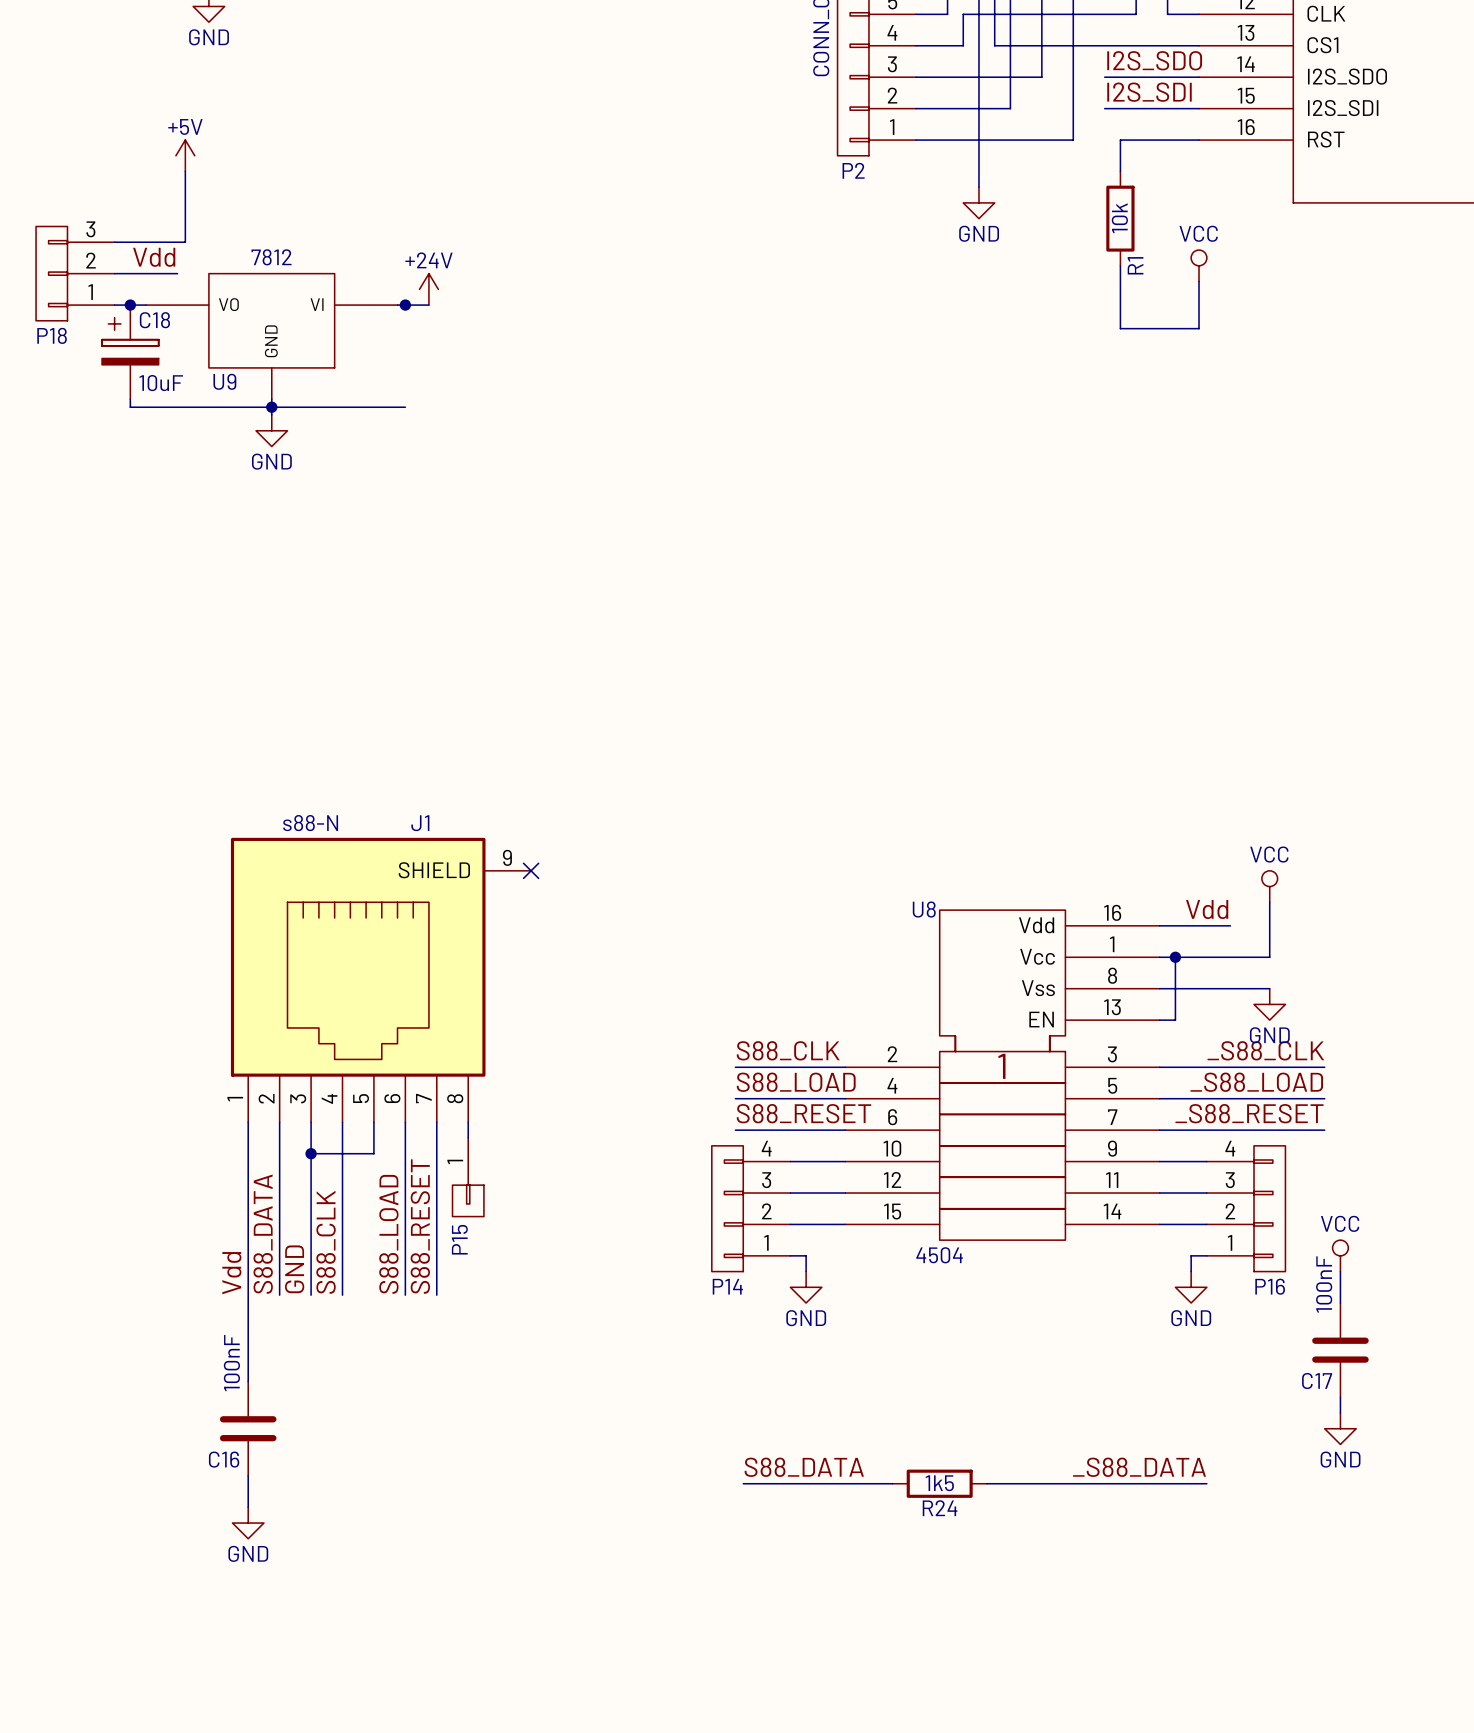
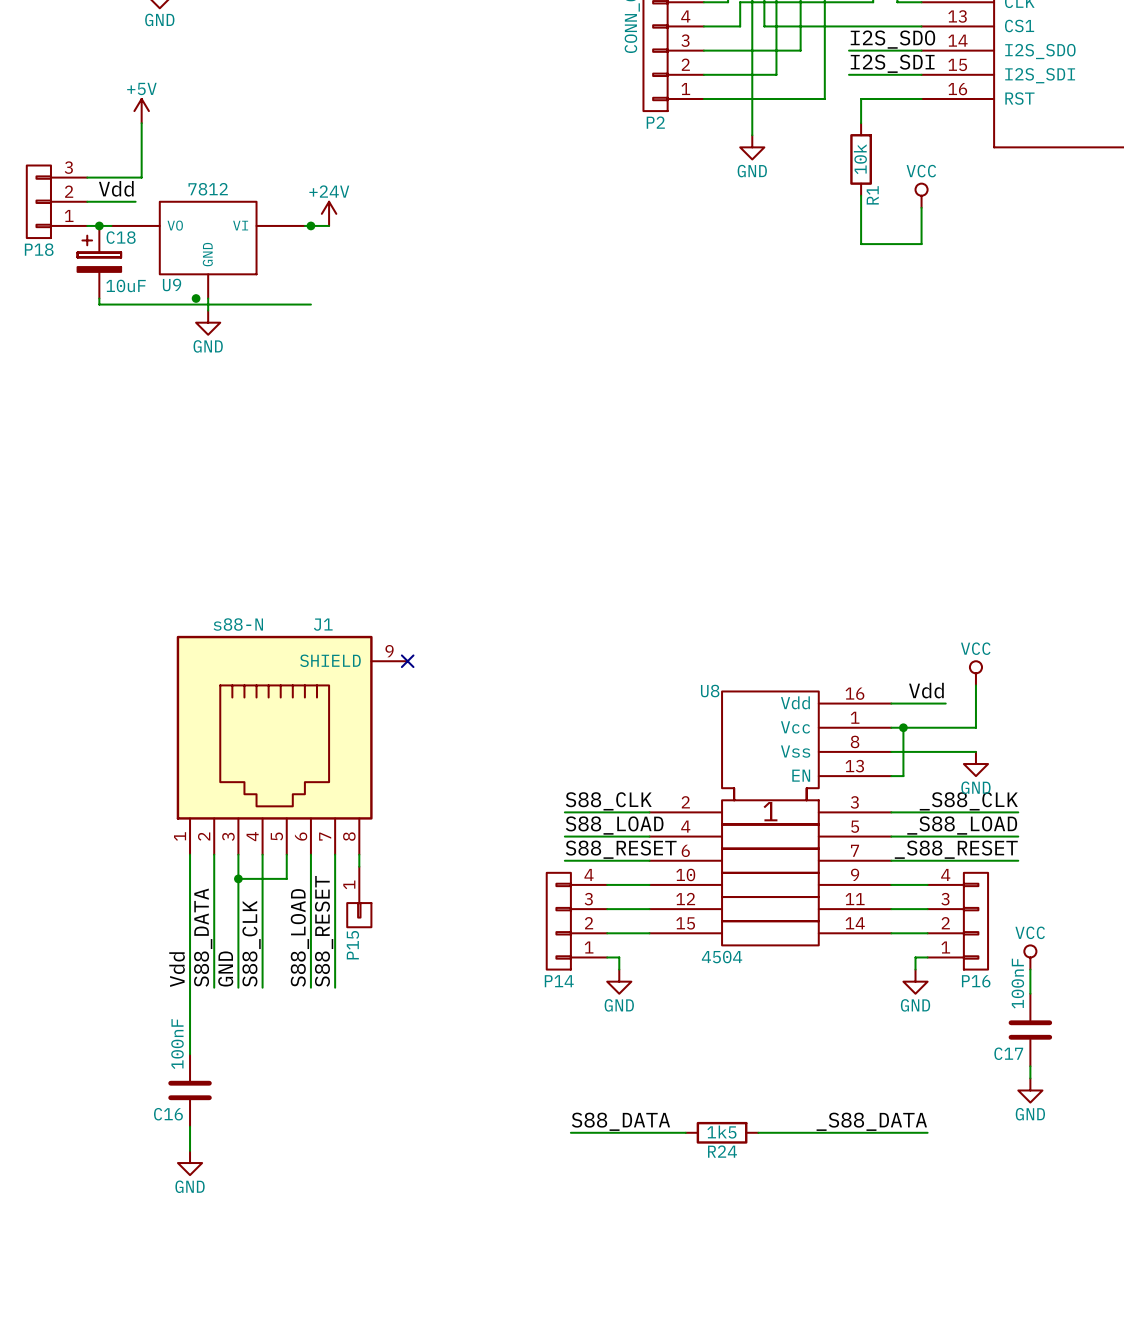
junction position: (271, 407) -> (196, 298)

